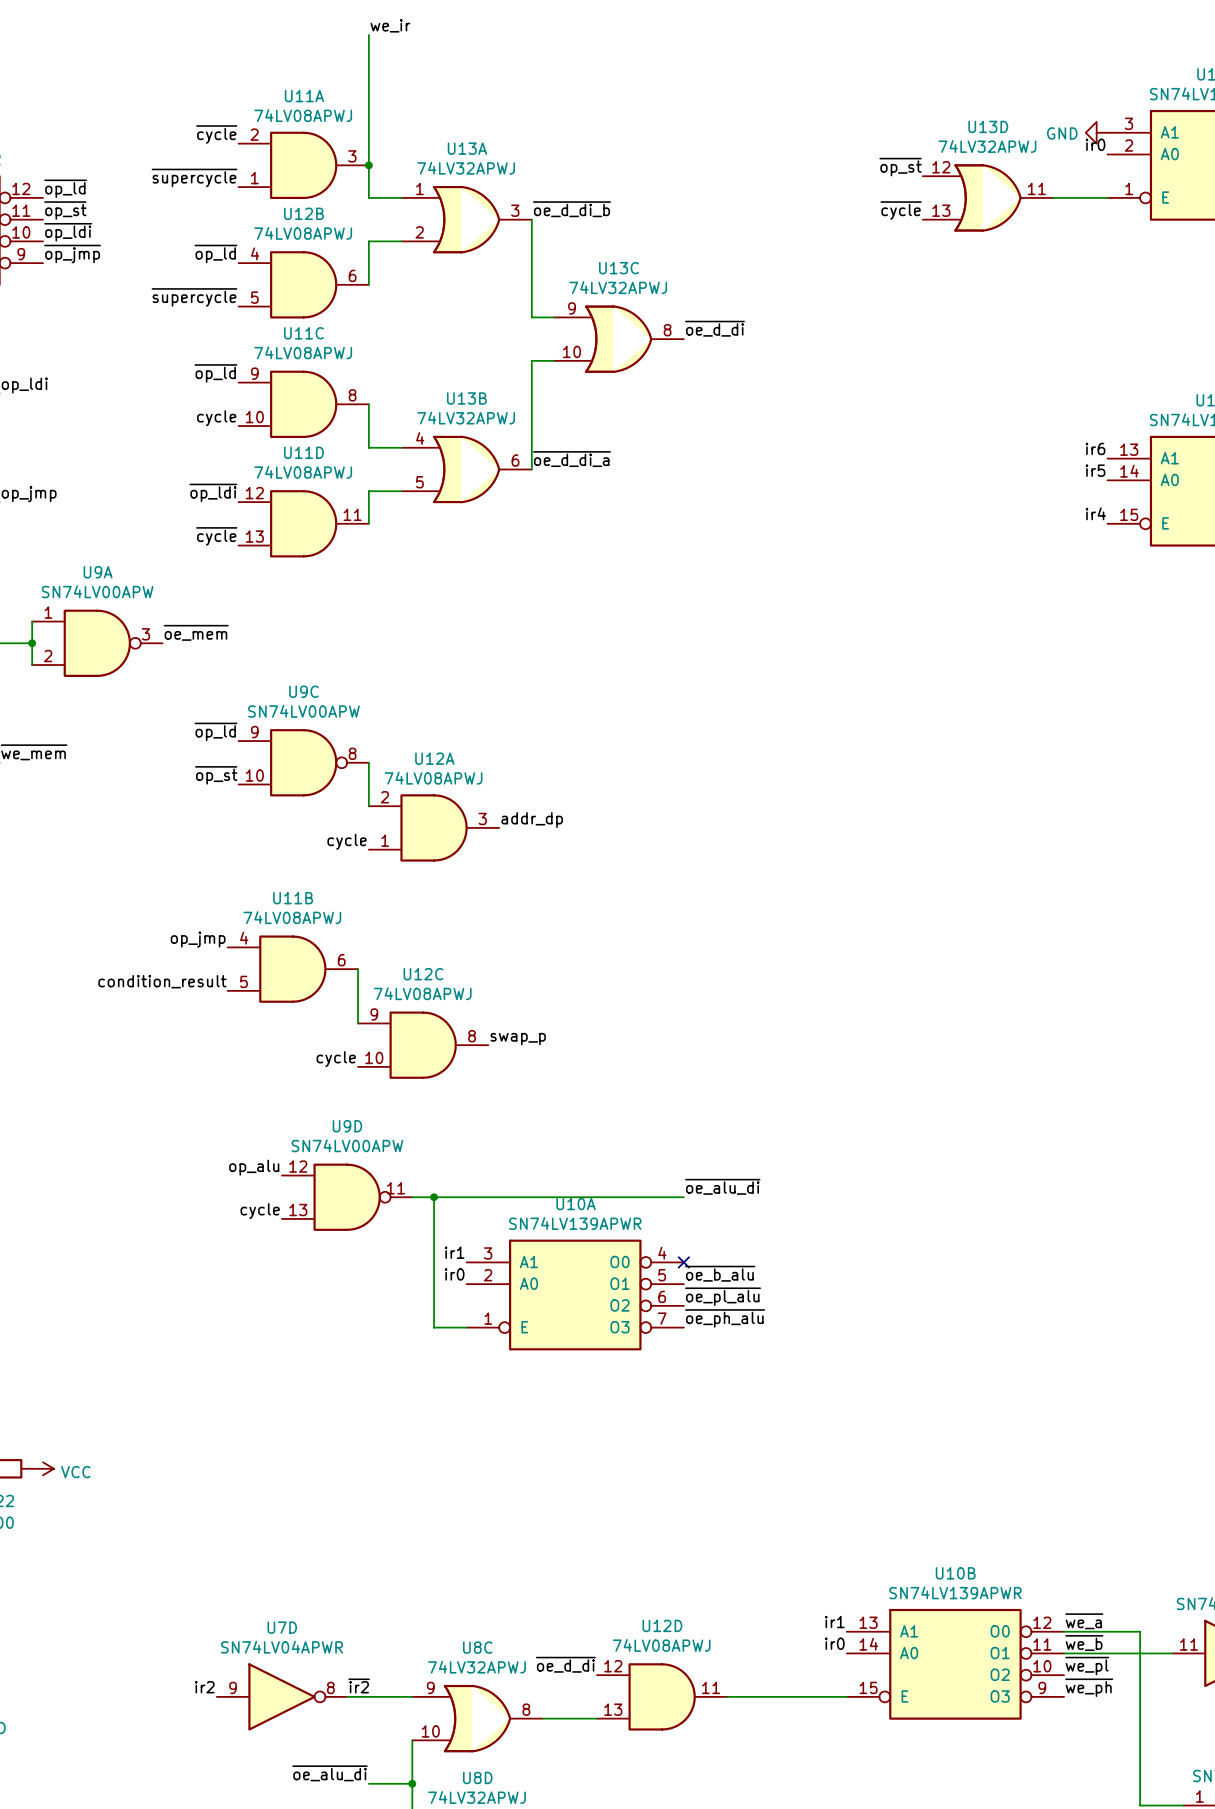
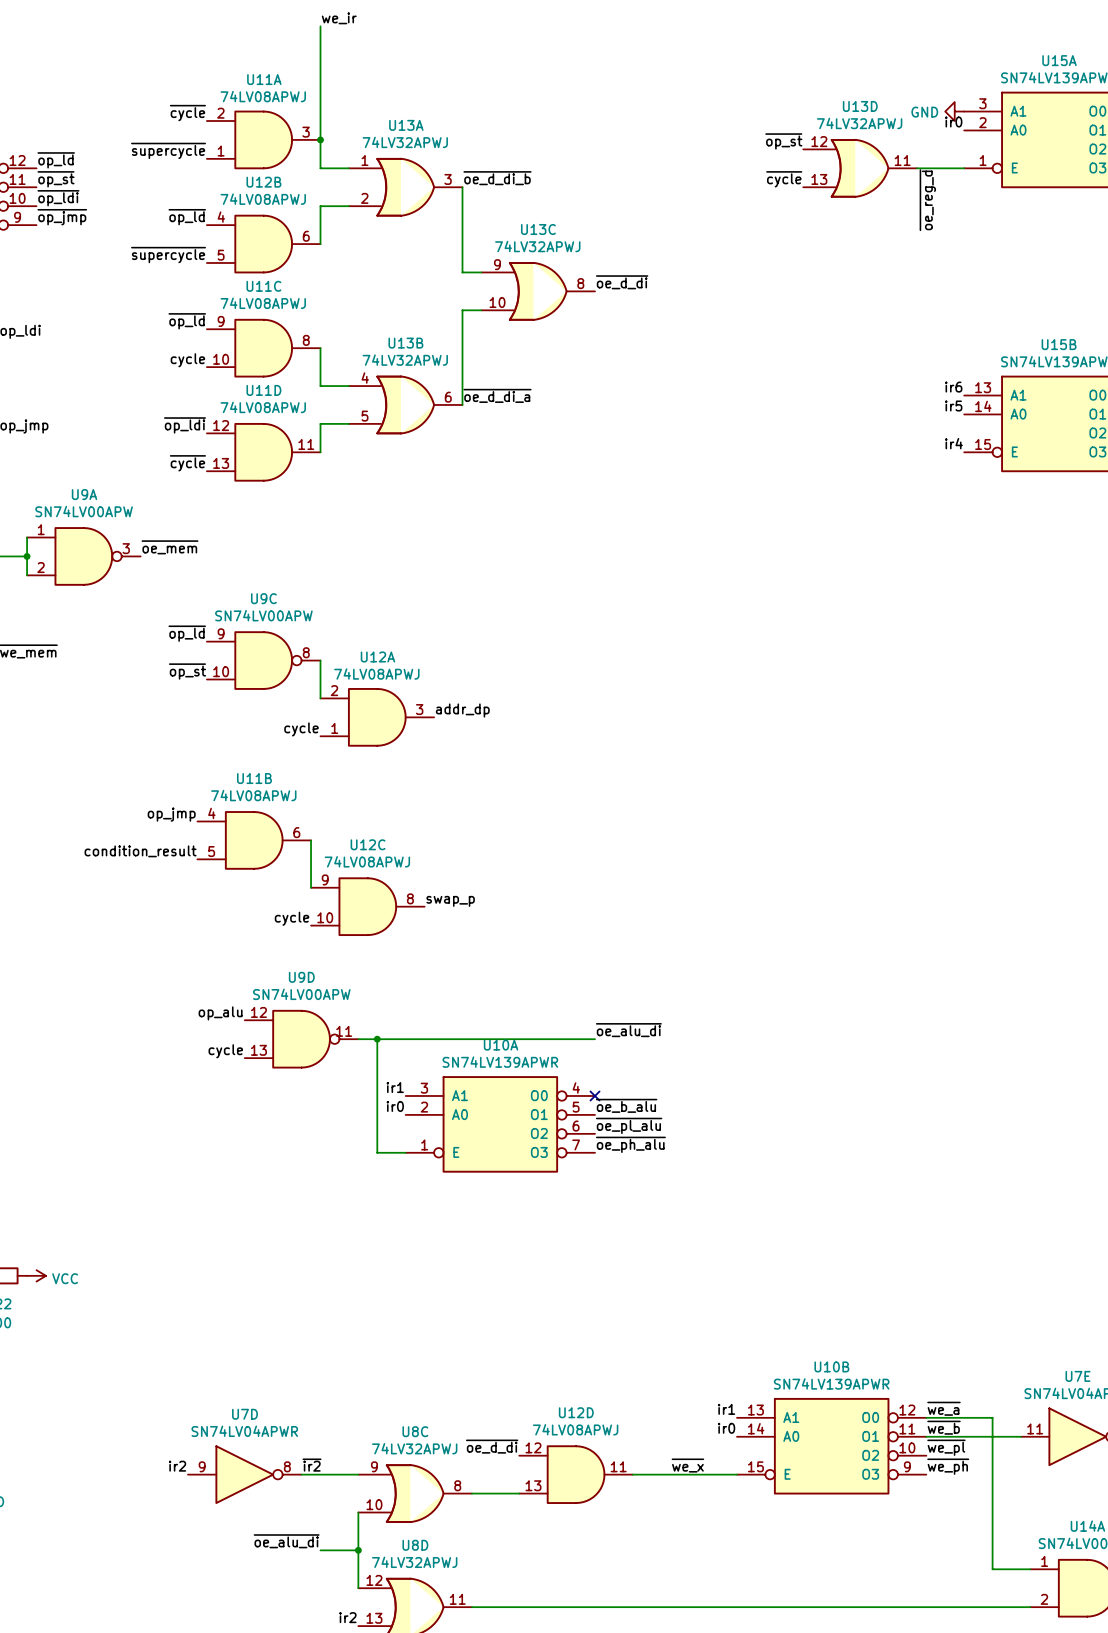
label: none -> ~{oe_reg_d} (927, 200)
label: none -> ~{we_x} (687, 1465)

